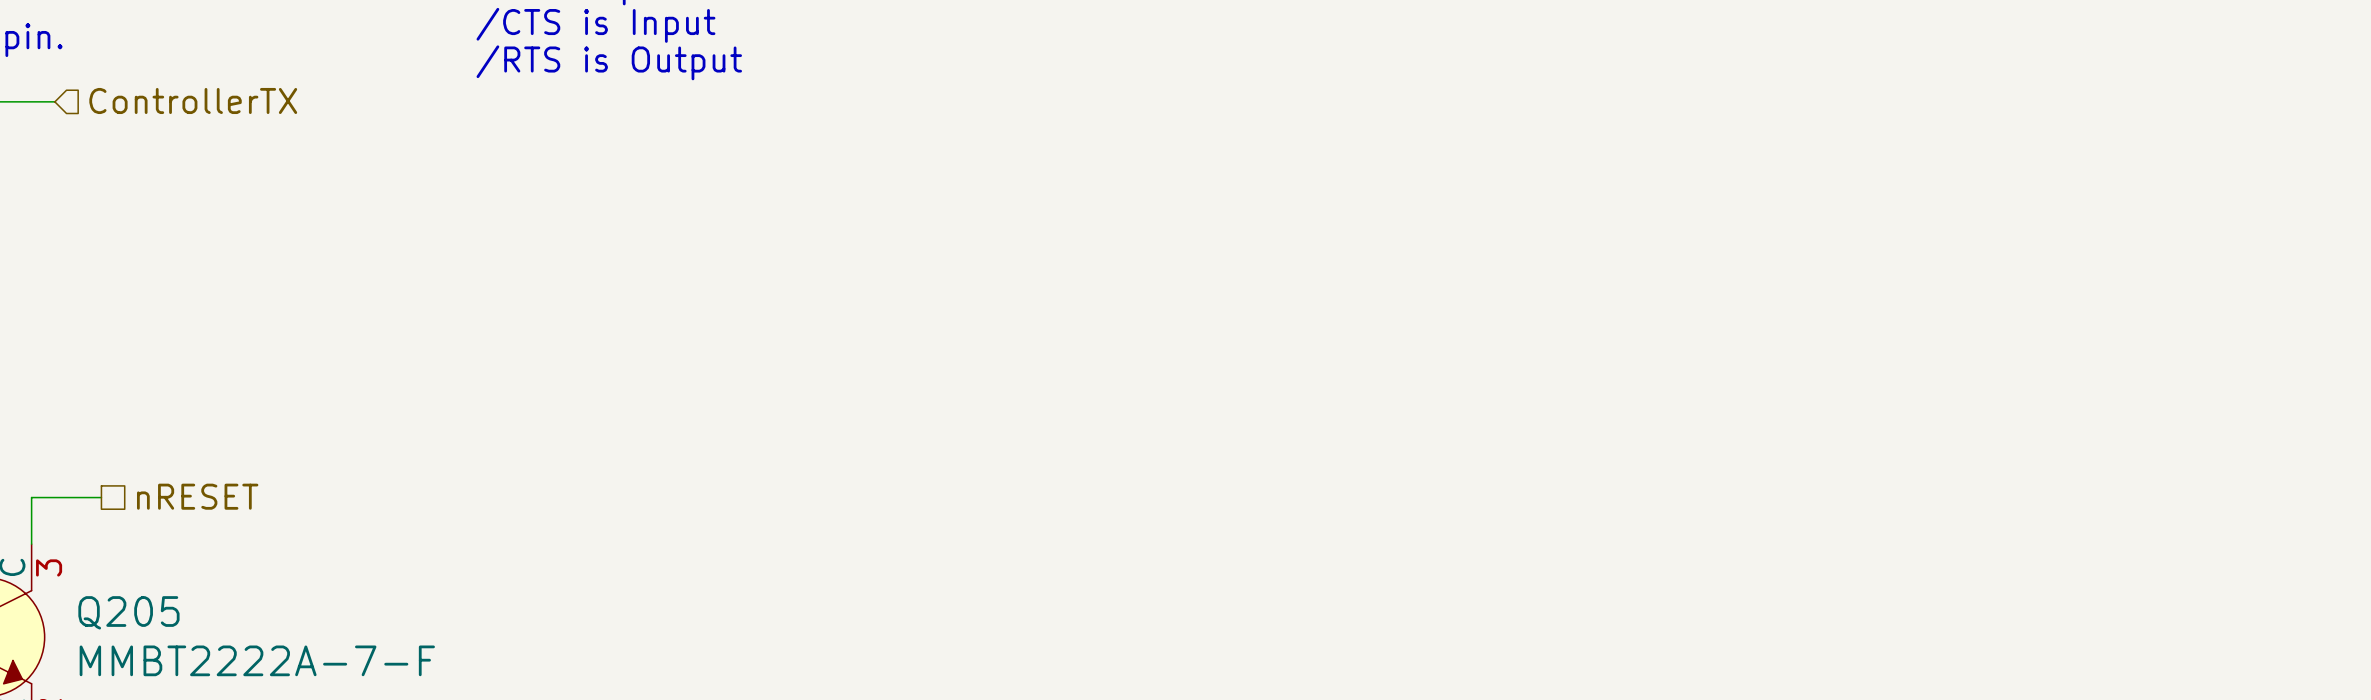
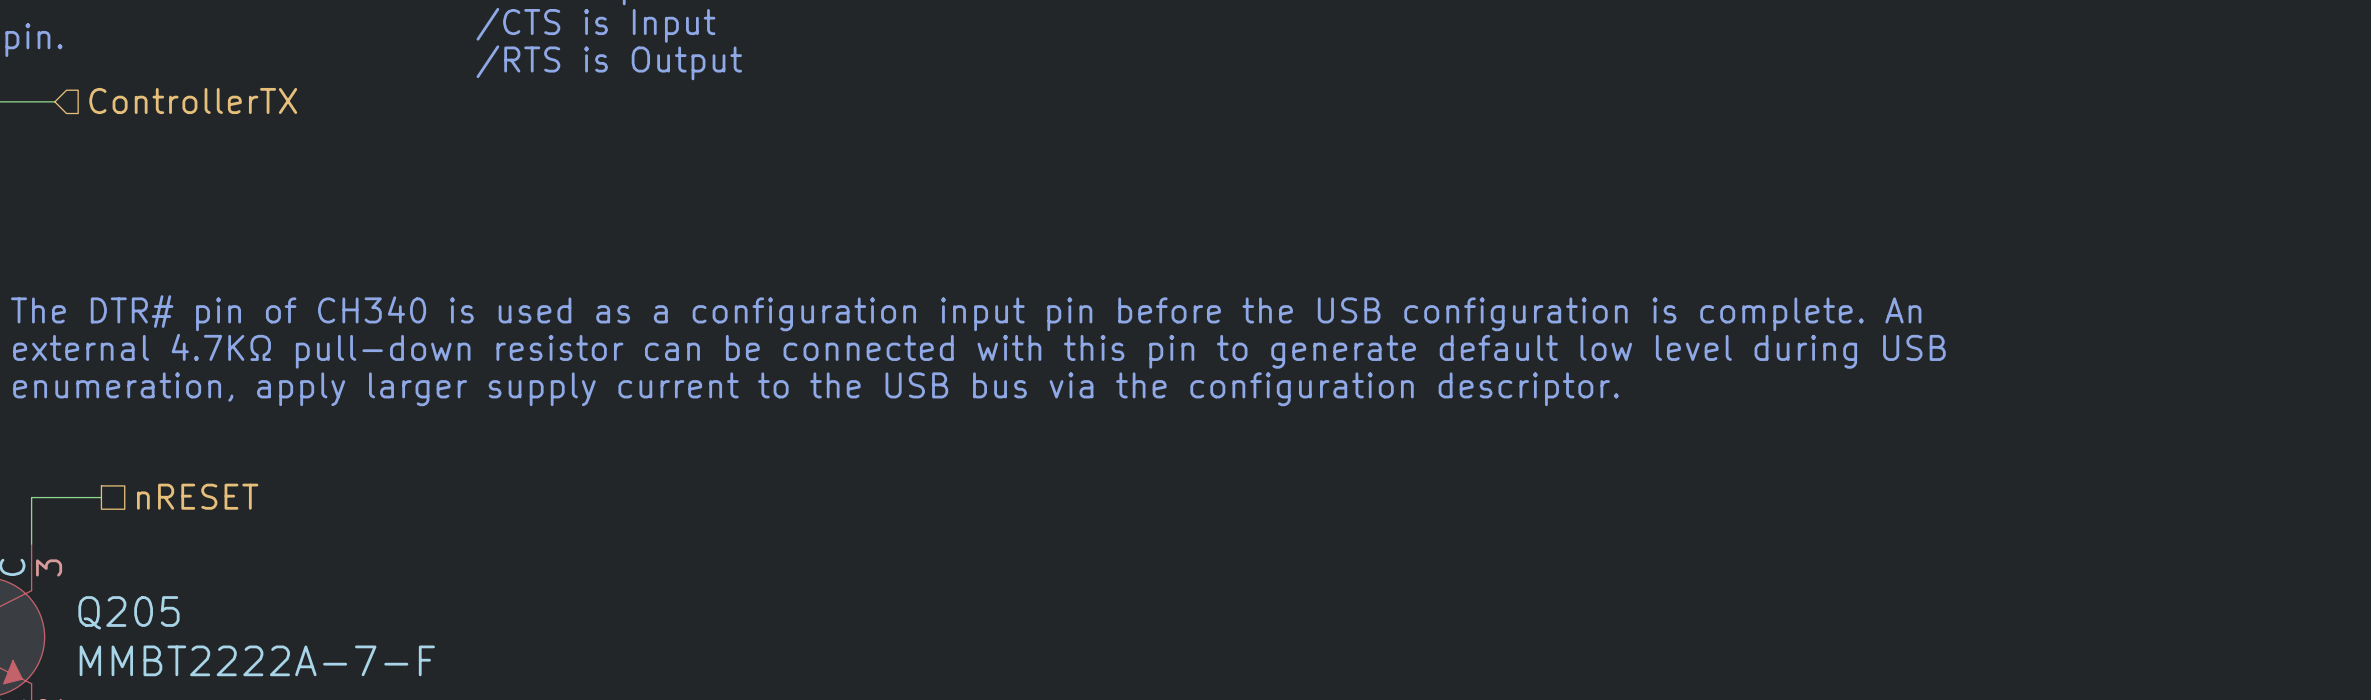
text: none -> The DTR# pin of CH340 is used as a configuration input pin before the USB configuration is complete. An (966, 313)
text: none -> external 4.7KΩ pull-down resistor can be connected with this pin to generate default low level during USB (979, 351)
text: none -> enumeration, apply larger supply current to the USB bus via the configuration descriptor. (815, 389)

